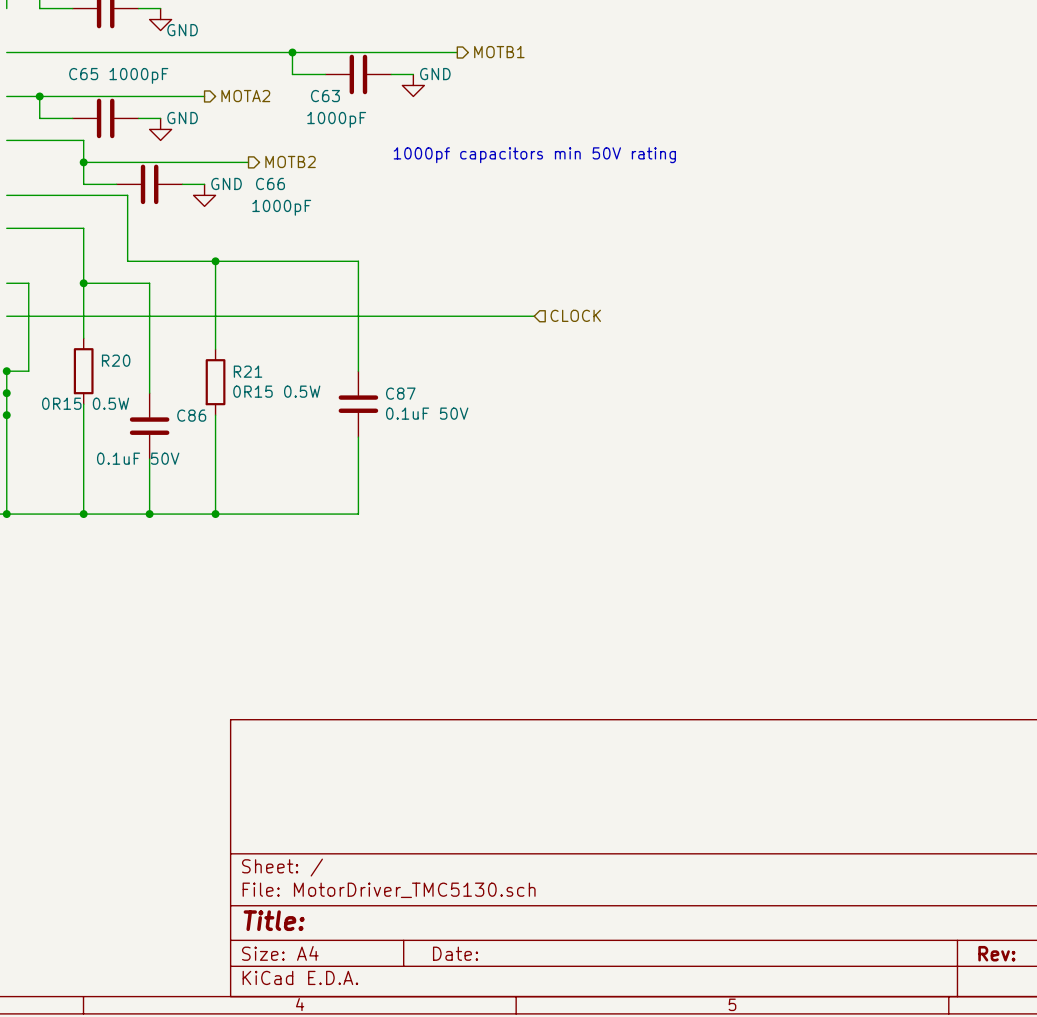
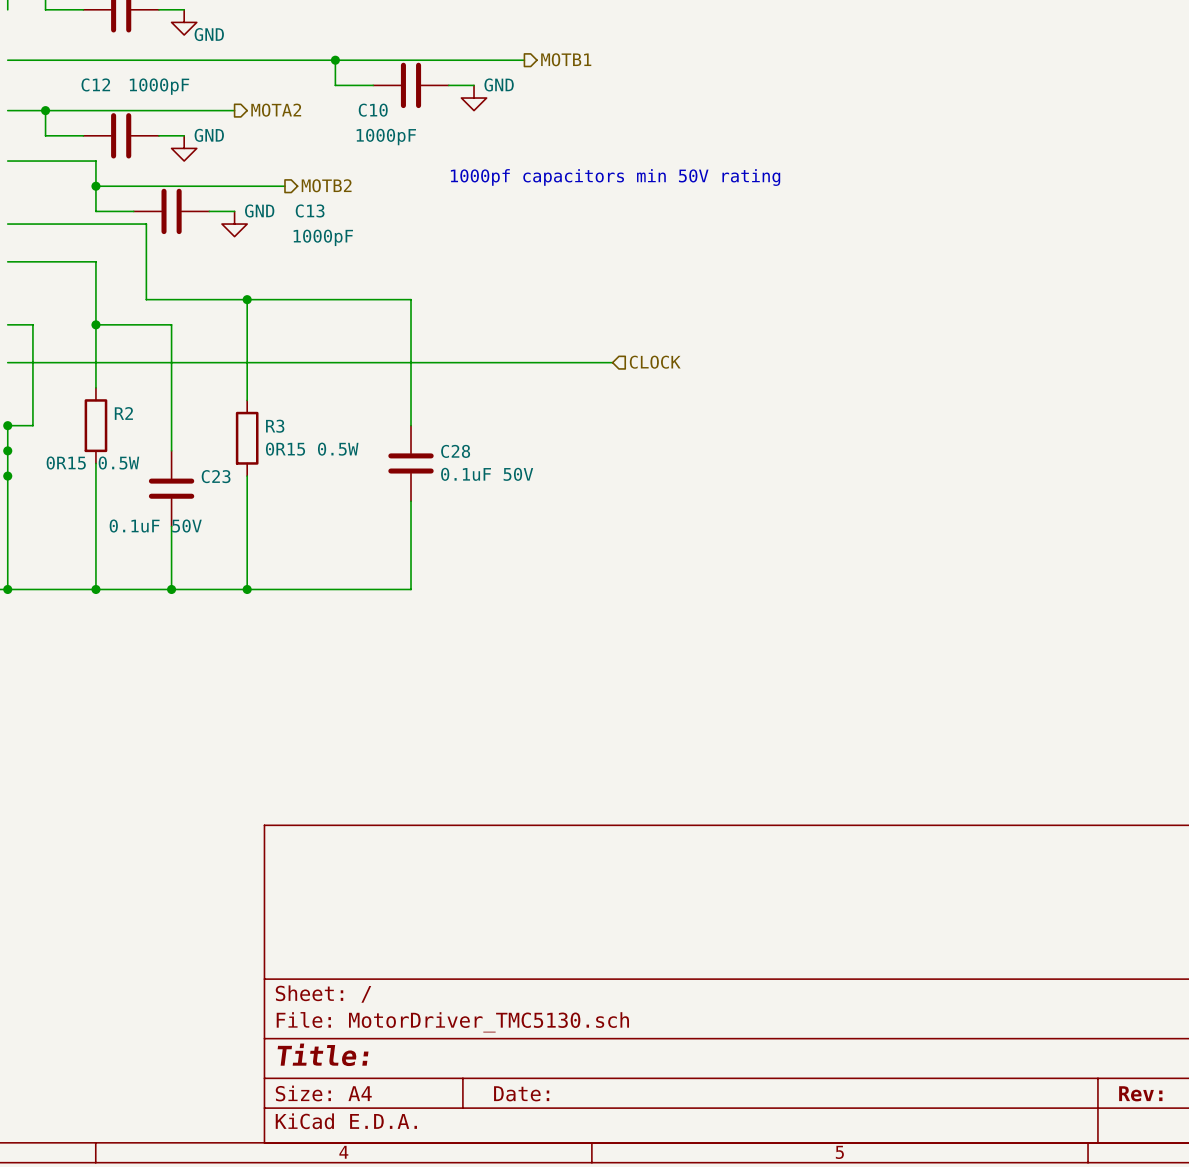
C65 name: C65 (83, 74) -> C12 (95, 84)
C63 name: C63 (325, 96) -> C10 (373, 110)
C66 name: C66 (270, 183) -> C13 (310, 210)
R20 name: R20 (116, 360) -> R2 (123, 413)
R21 name: R21 (248, 371) -> R3 (275, 426)
C87 name: C87 (400, 393) -> C28 (455, 451)
C86 name: C86 (191, 415) -> C23 (216, 476)

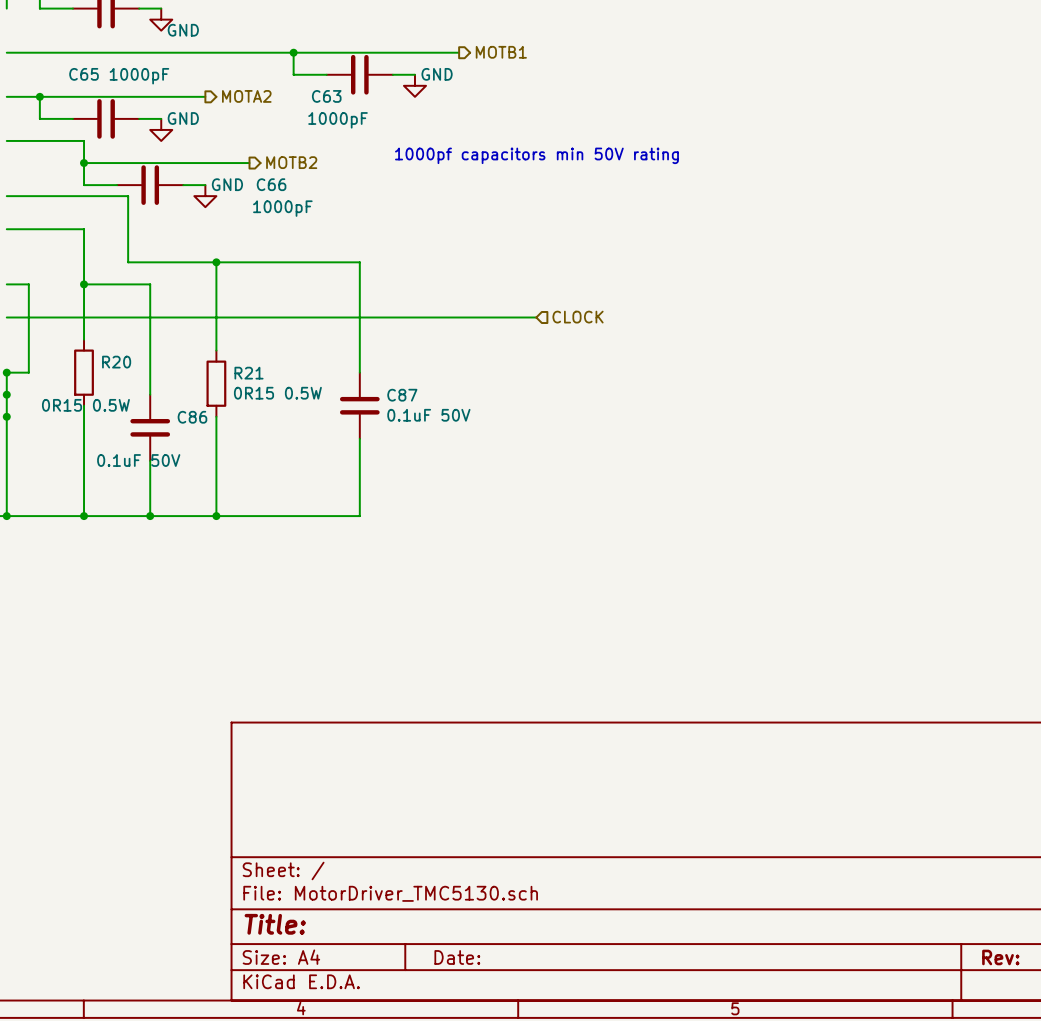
C12 name: C12 (95, 84) -> C65 (84, 74)
C10 name: C10 (373, 110) -> C63 (326, 96)
C13 name: C13 (310, 210) -> C66 (271, 184)
R2 name: R2 (123, 413) -> R20 (116, 362)
R3 name: R3 (275, 426) -> R21 (249, 373)
C28 name: C28 (455, 451) -> C87 (402, 395)
C23 name: C23 (216, 476) -> C86 (192, 417)

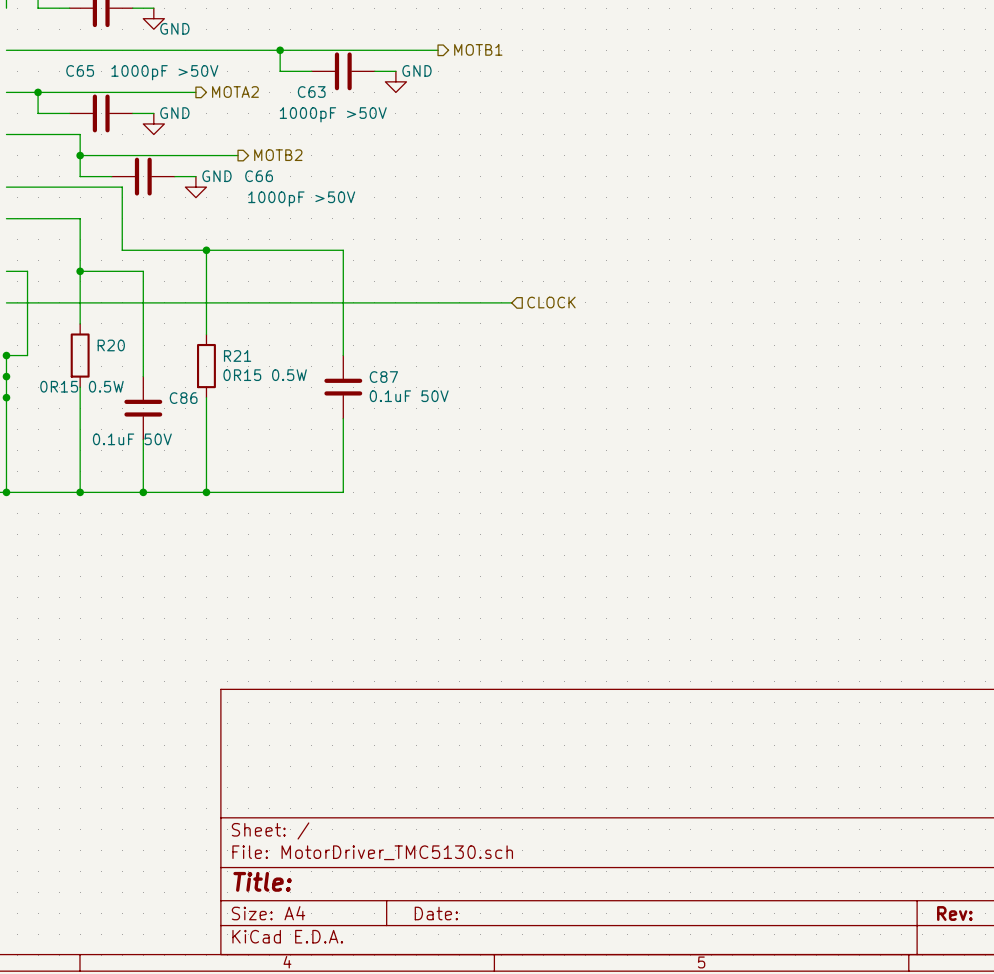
C65 value: 1000pF (139, 76) -> 1000pF >50V (164, 72)
C63 value: 1000pF (338, 120) -> 1000pF >50V (333, 114)
text: 1000pf capacitors min 50V rating (536, 155) -> none
C66 value: 1000pF (282, 208) -> 1000pF >50V (301, 199)

